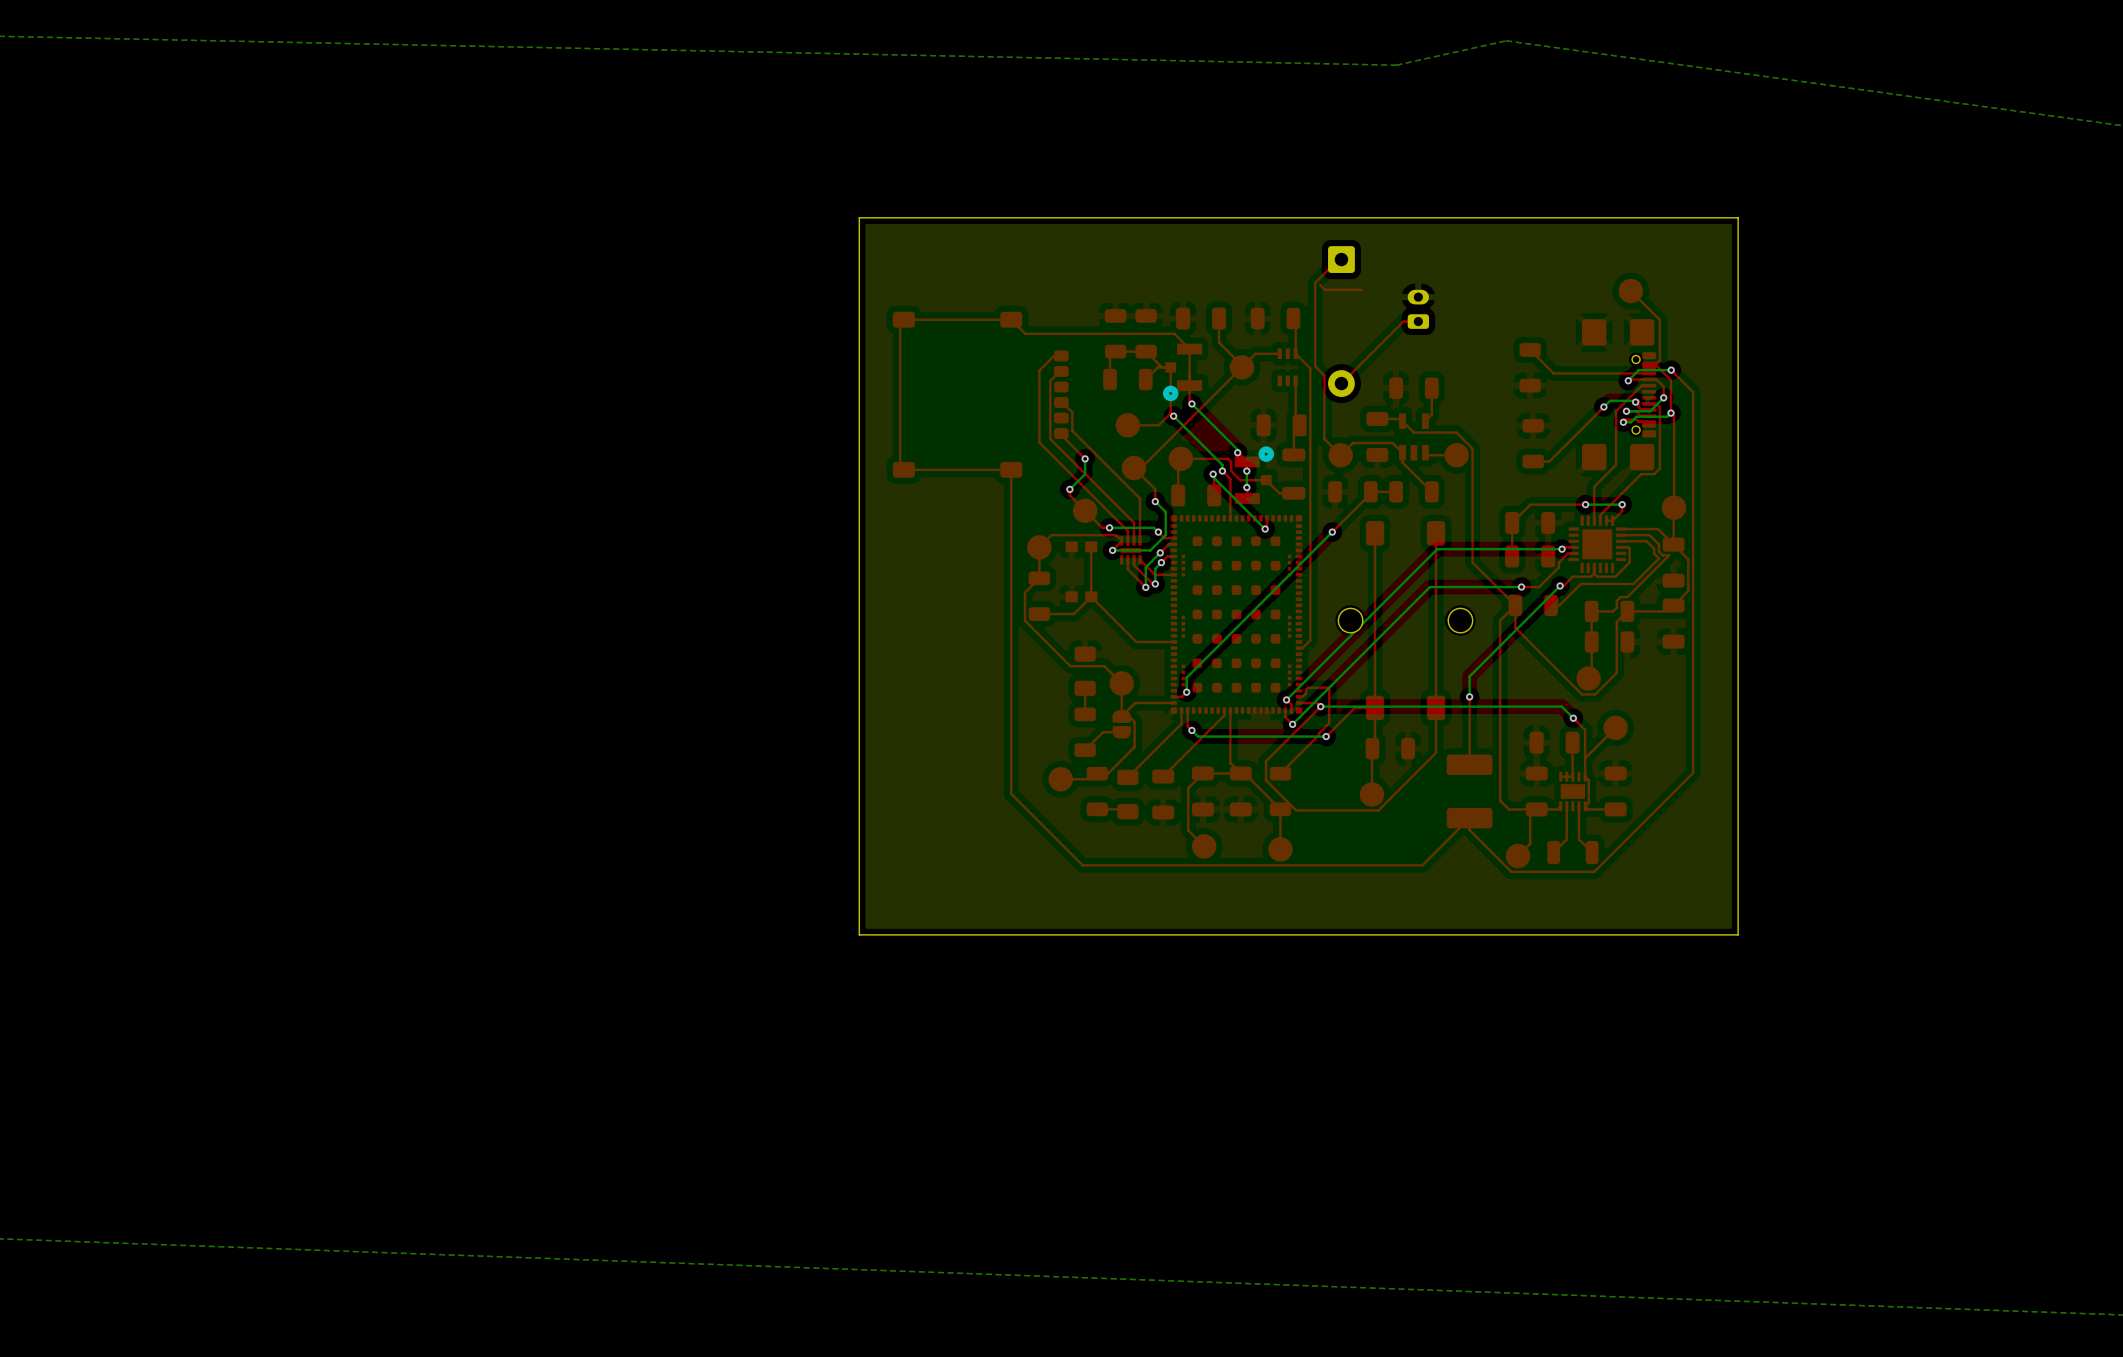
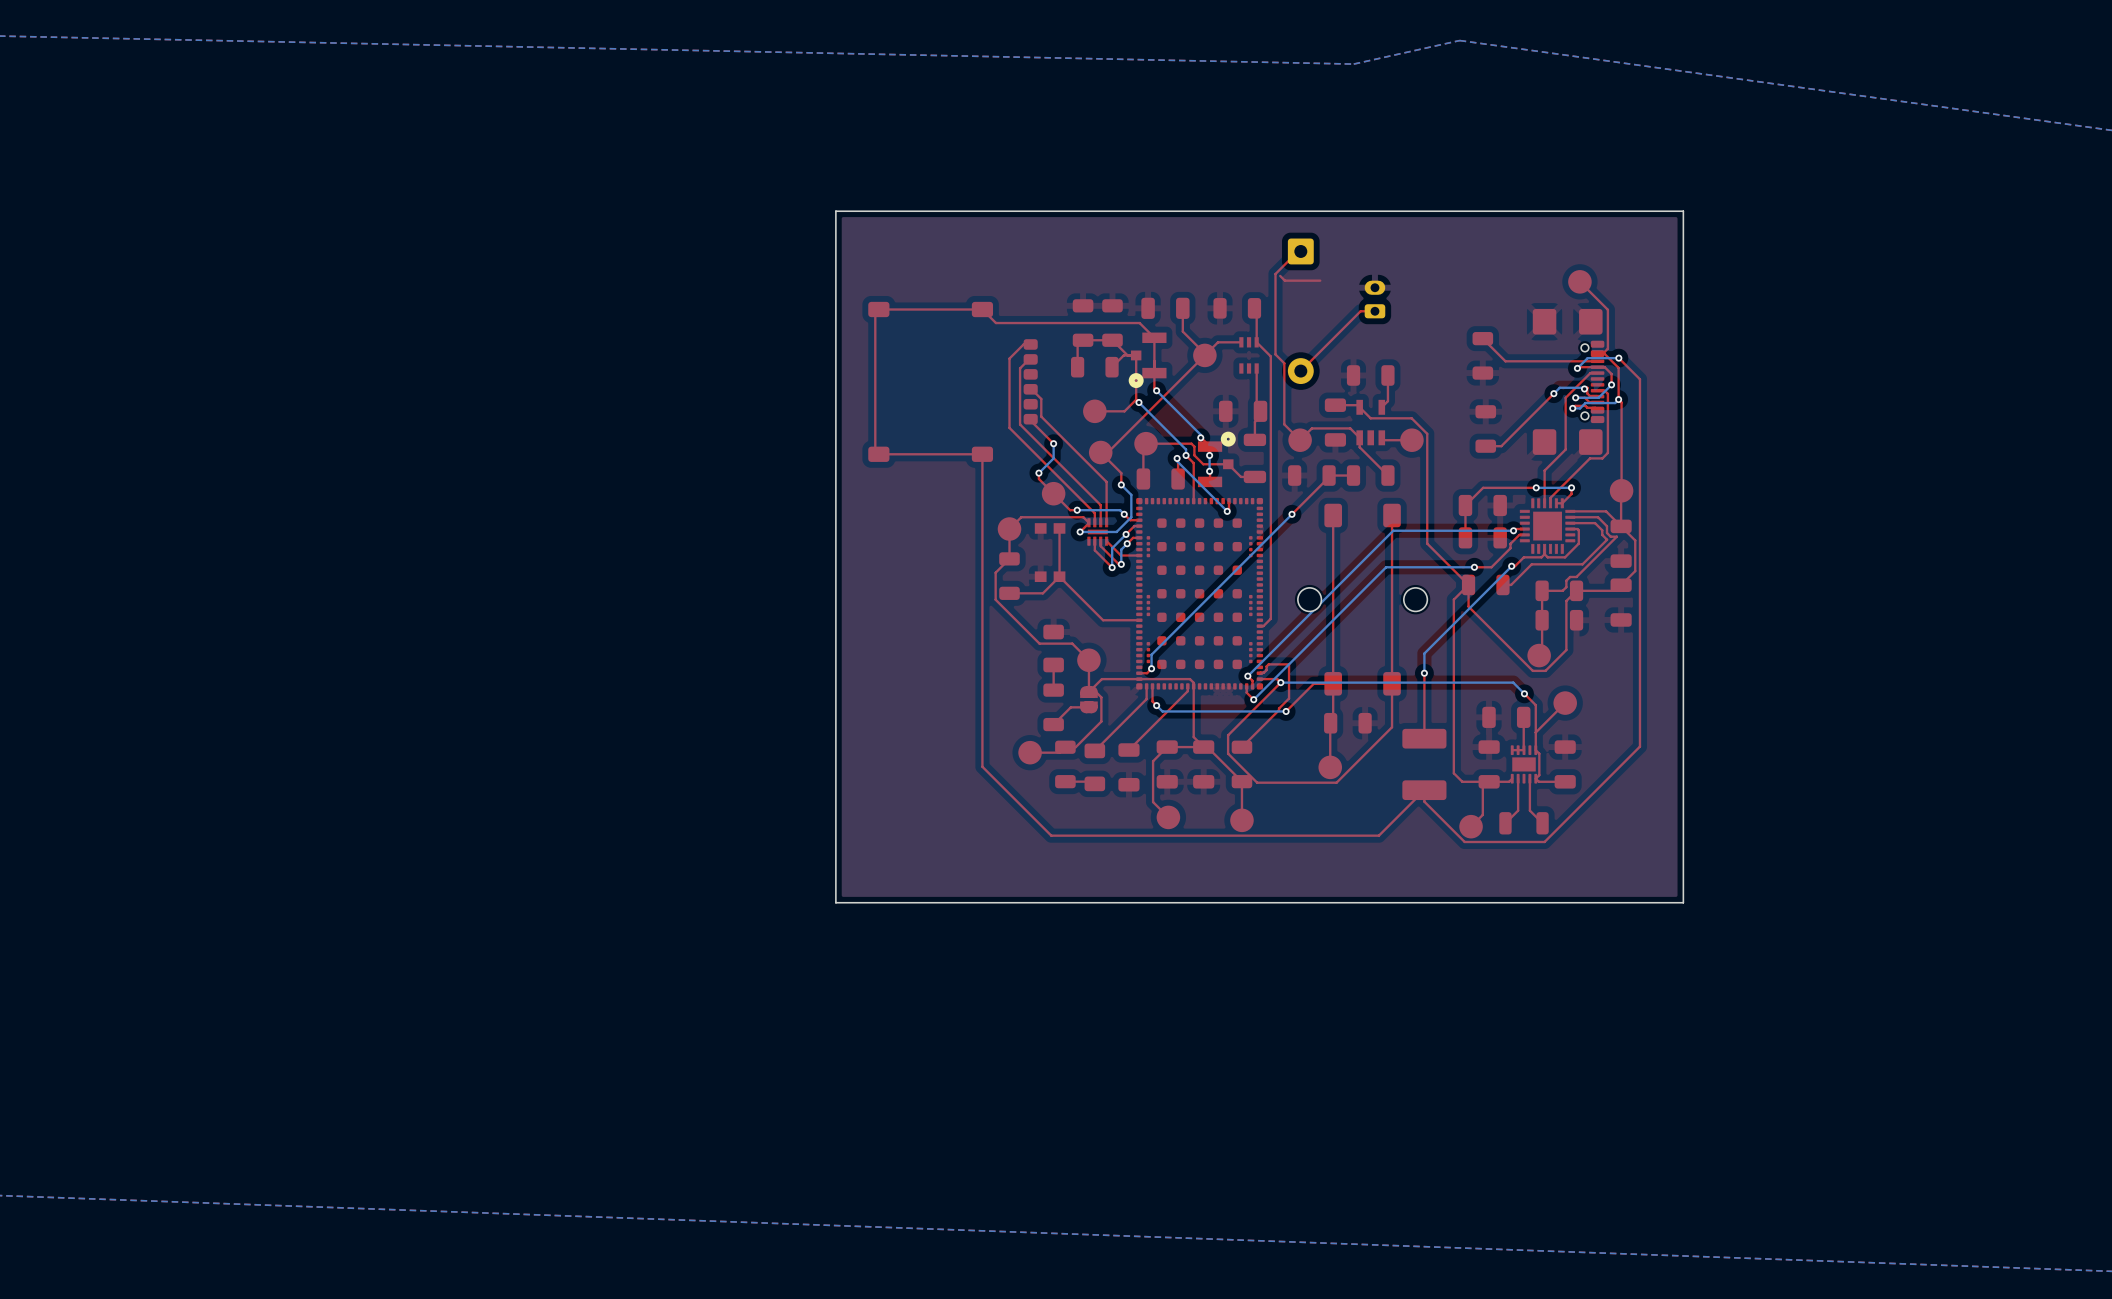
top track: none -> (1139, 679) (1189, 679) (1193, 682) (1193, 686)

